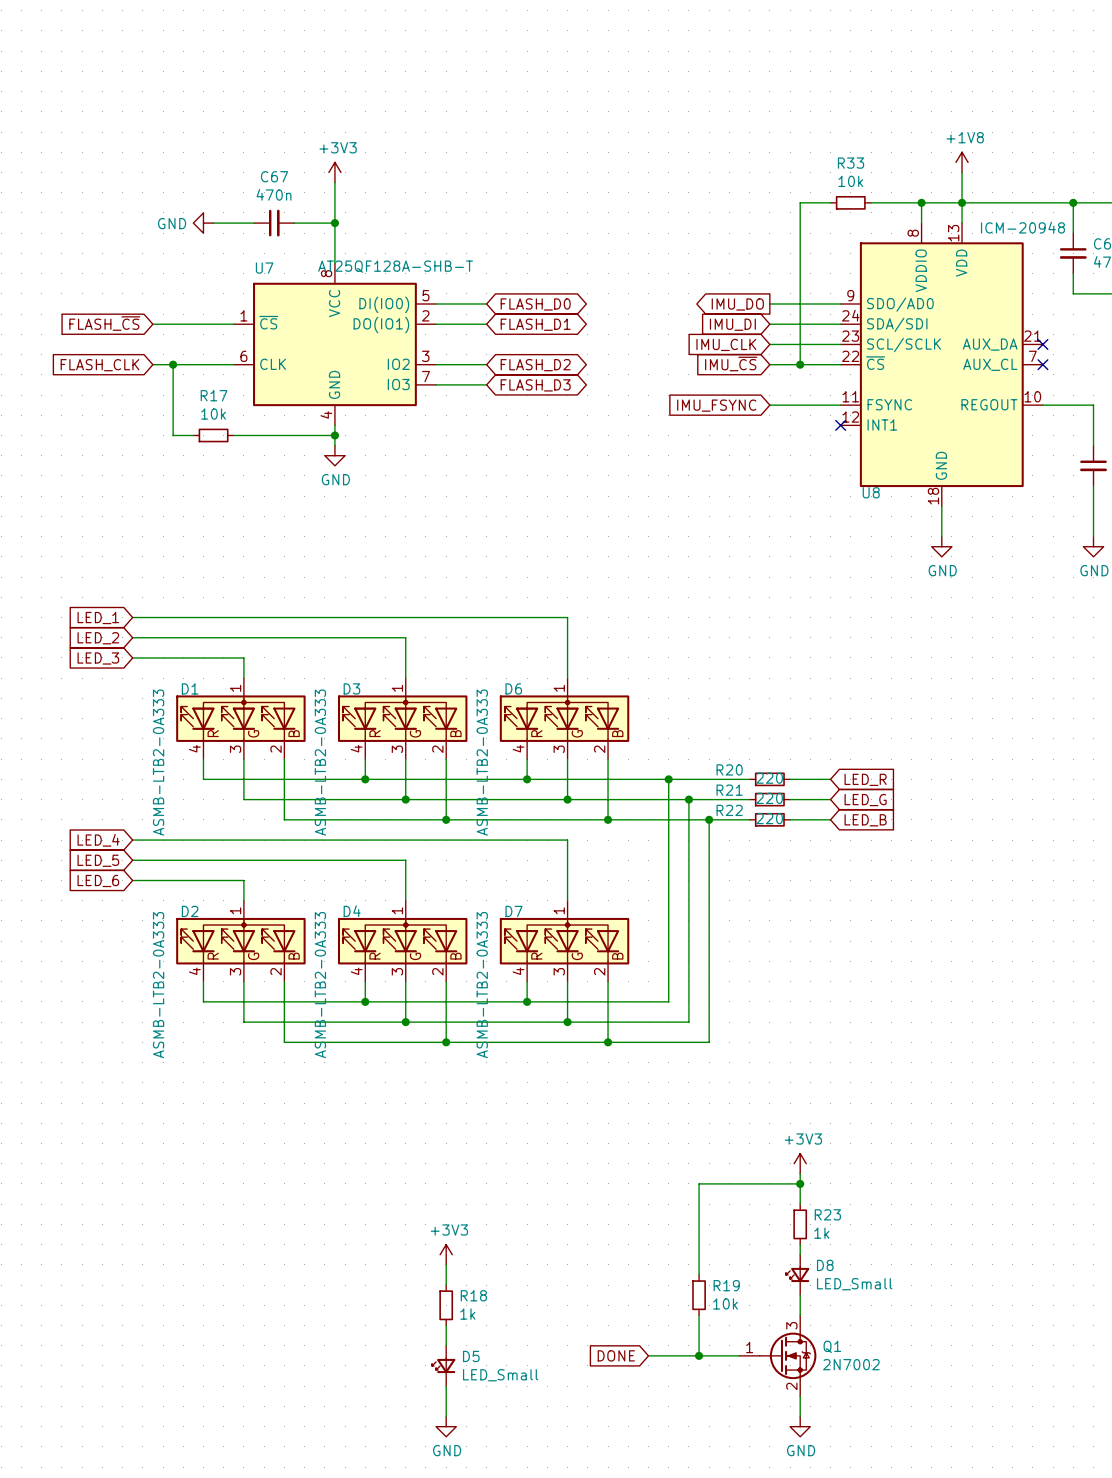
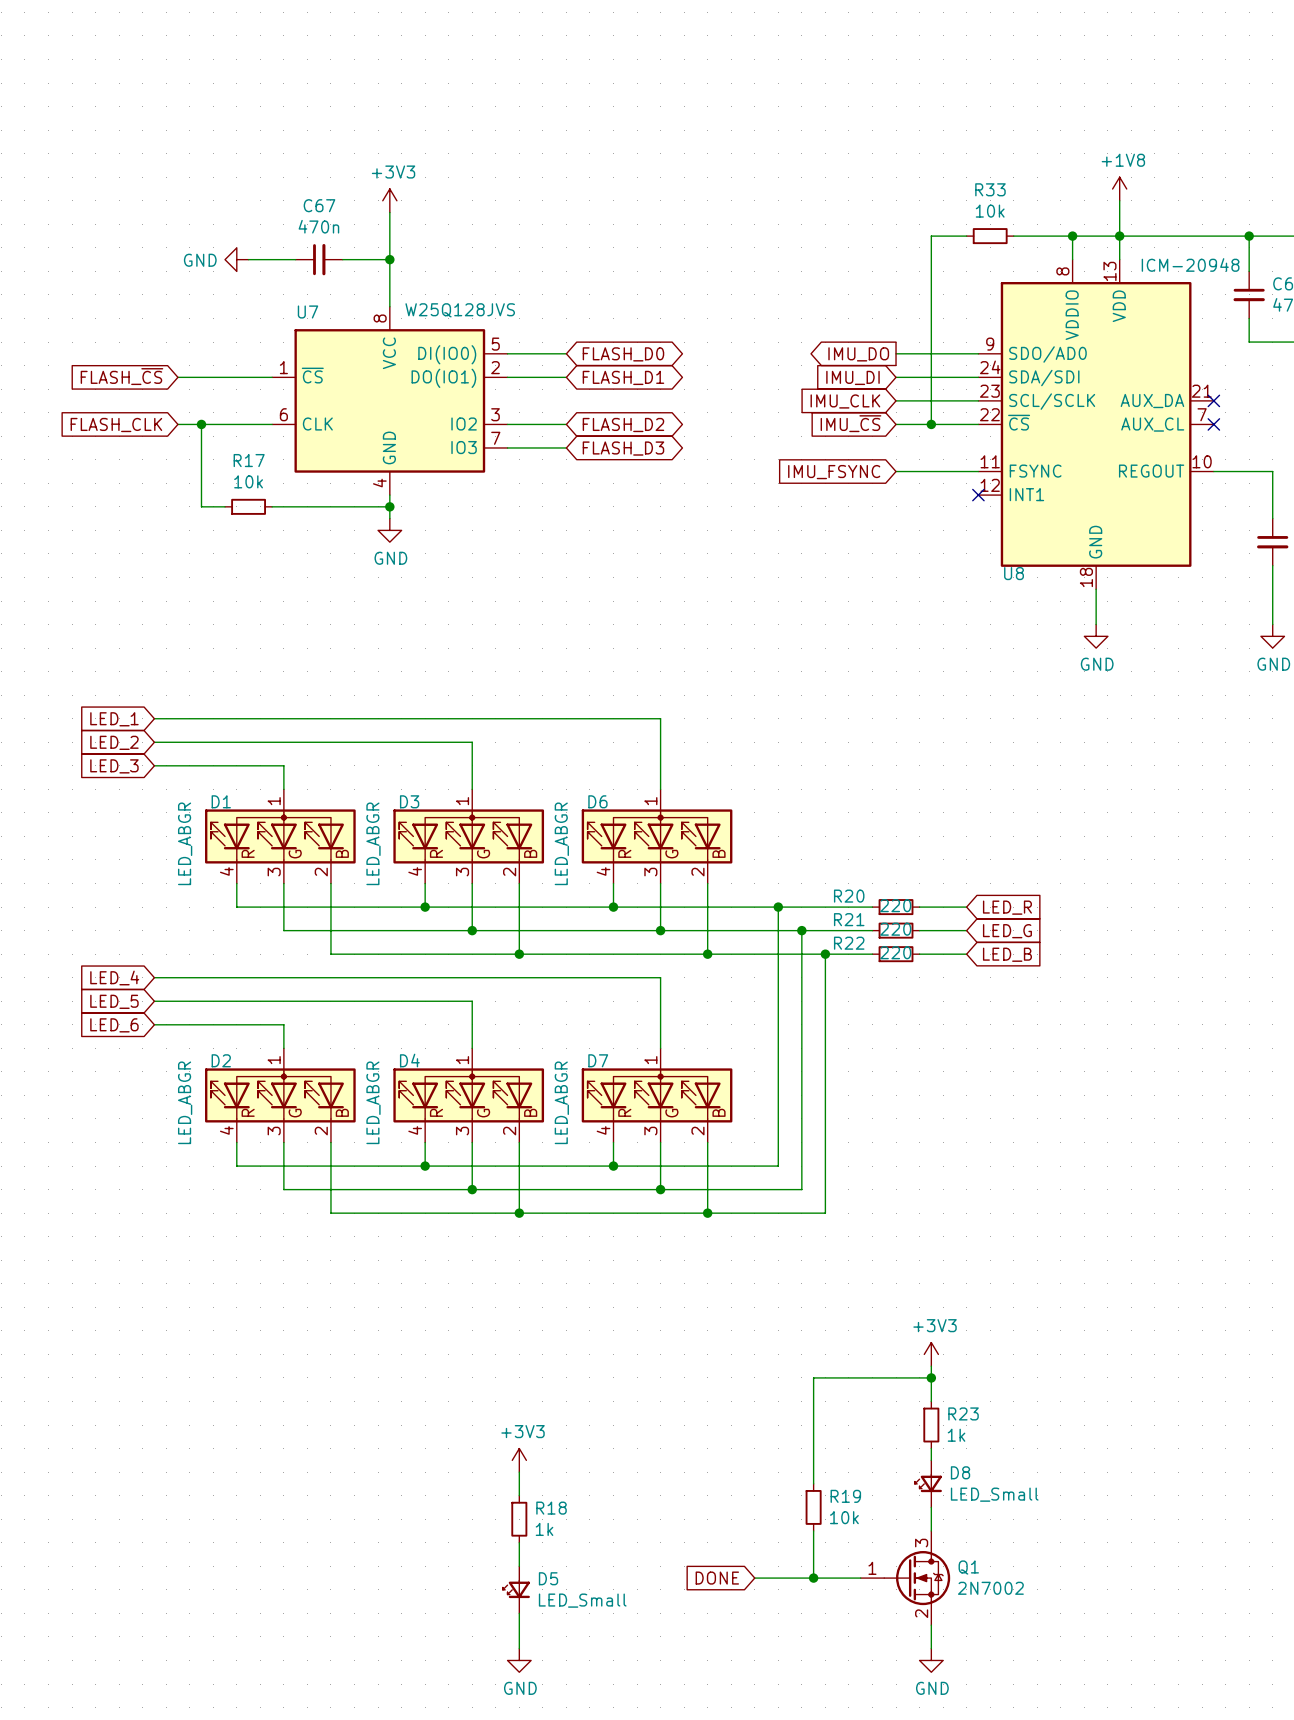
U7 value: AT25QF128A-SHB-T (395, 266) -> W25Q128JVS (460, 310)
D1 value: ASMB-LTB2-0A333 (158, 762) -> LED_ABGR (185, 843)
D3 value: ASMB-LTB2-0A333 (320, 762) -> LED_ABGR (373, 843)
D6 value: ASMB-LTB2-0A333 (482, 762) -> LED_ABGR (561, 843)
D2 value: ASMB-LTB2-0A333 (158, 985) -> LED_ABGR (185, 1102)
D4 value: ASMB-LTB2-0A333 (320, 985) -> LED_ABGR (373, 1102)
D7 value: ASMB-LTB2-0A333 (482, 985) -> LED_ABGR (561, 1102)

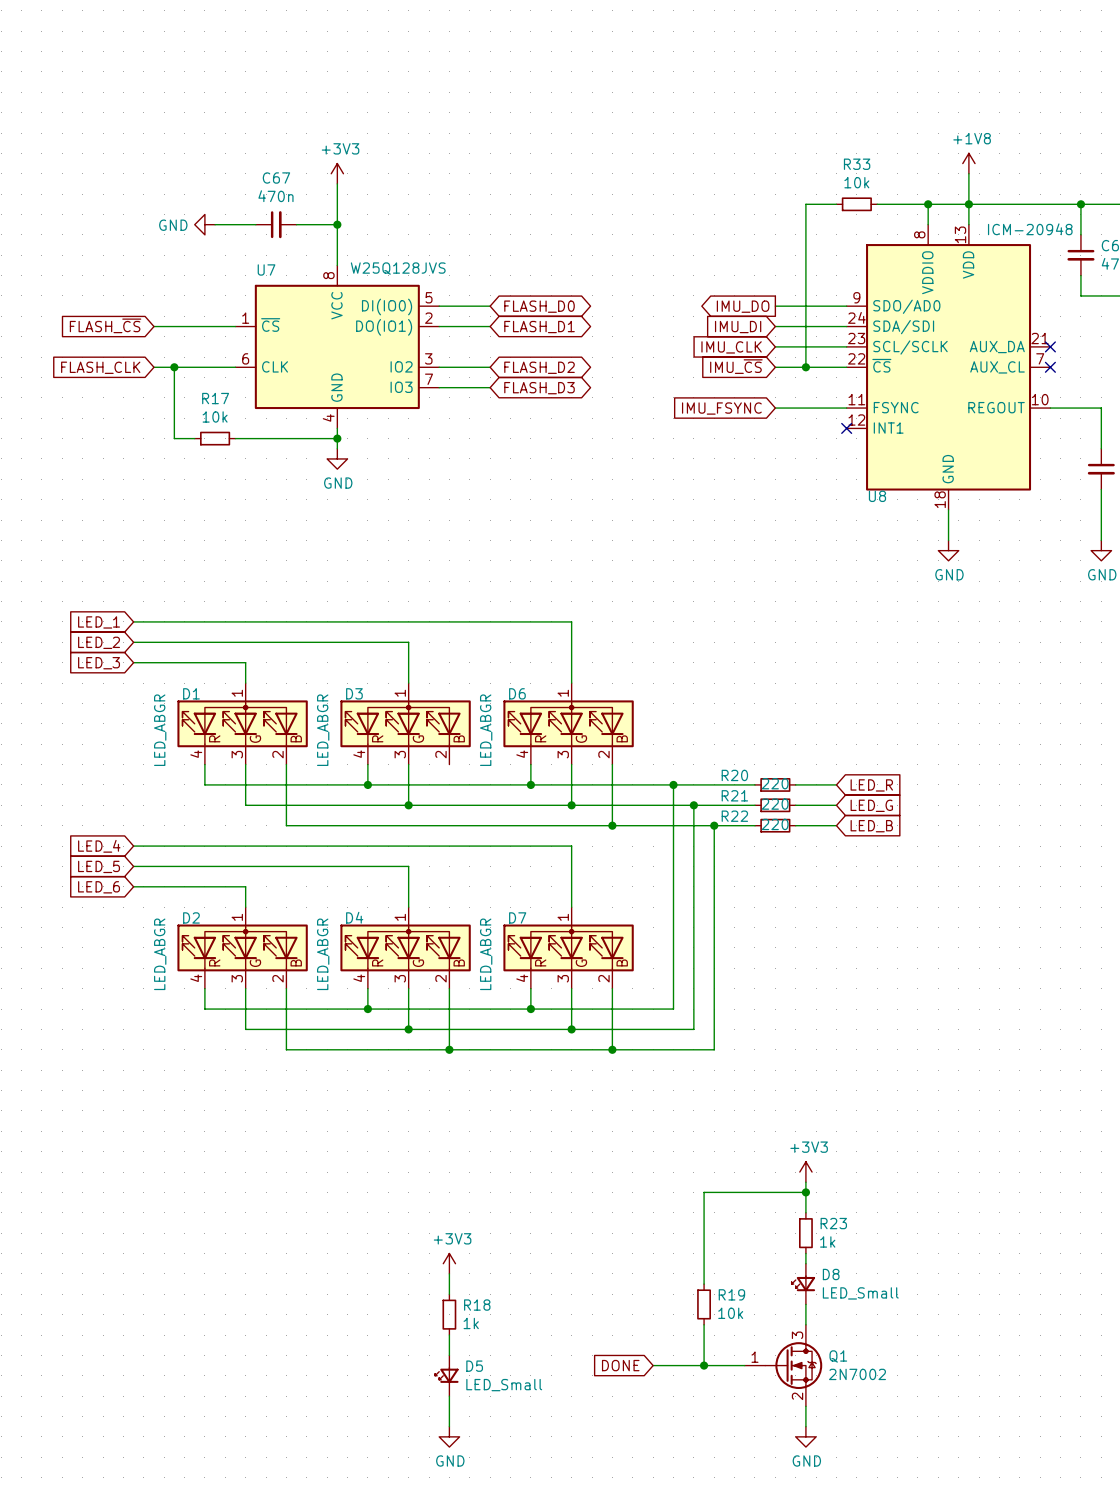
wire: (519, 883) (519, 954) -> none
junction: (519, 954) -> none

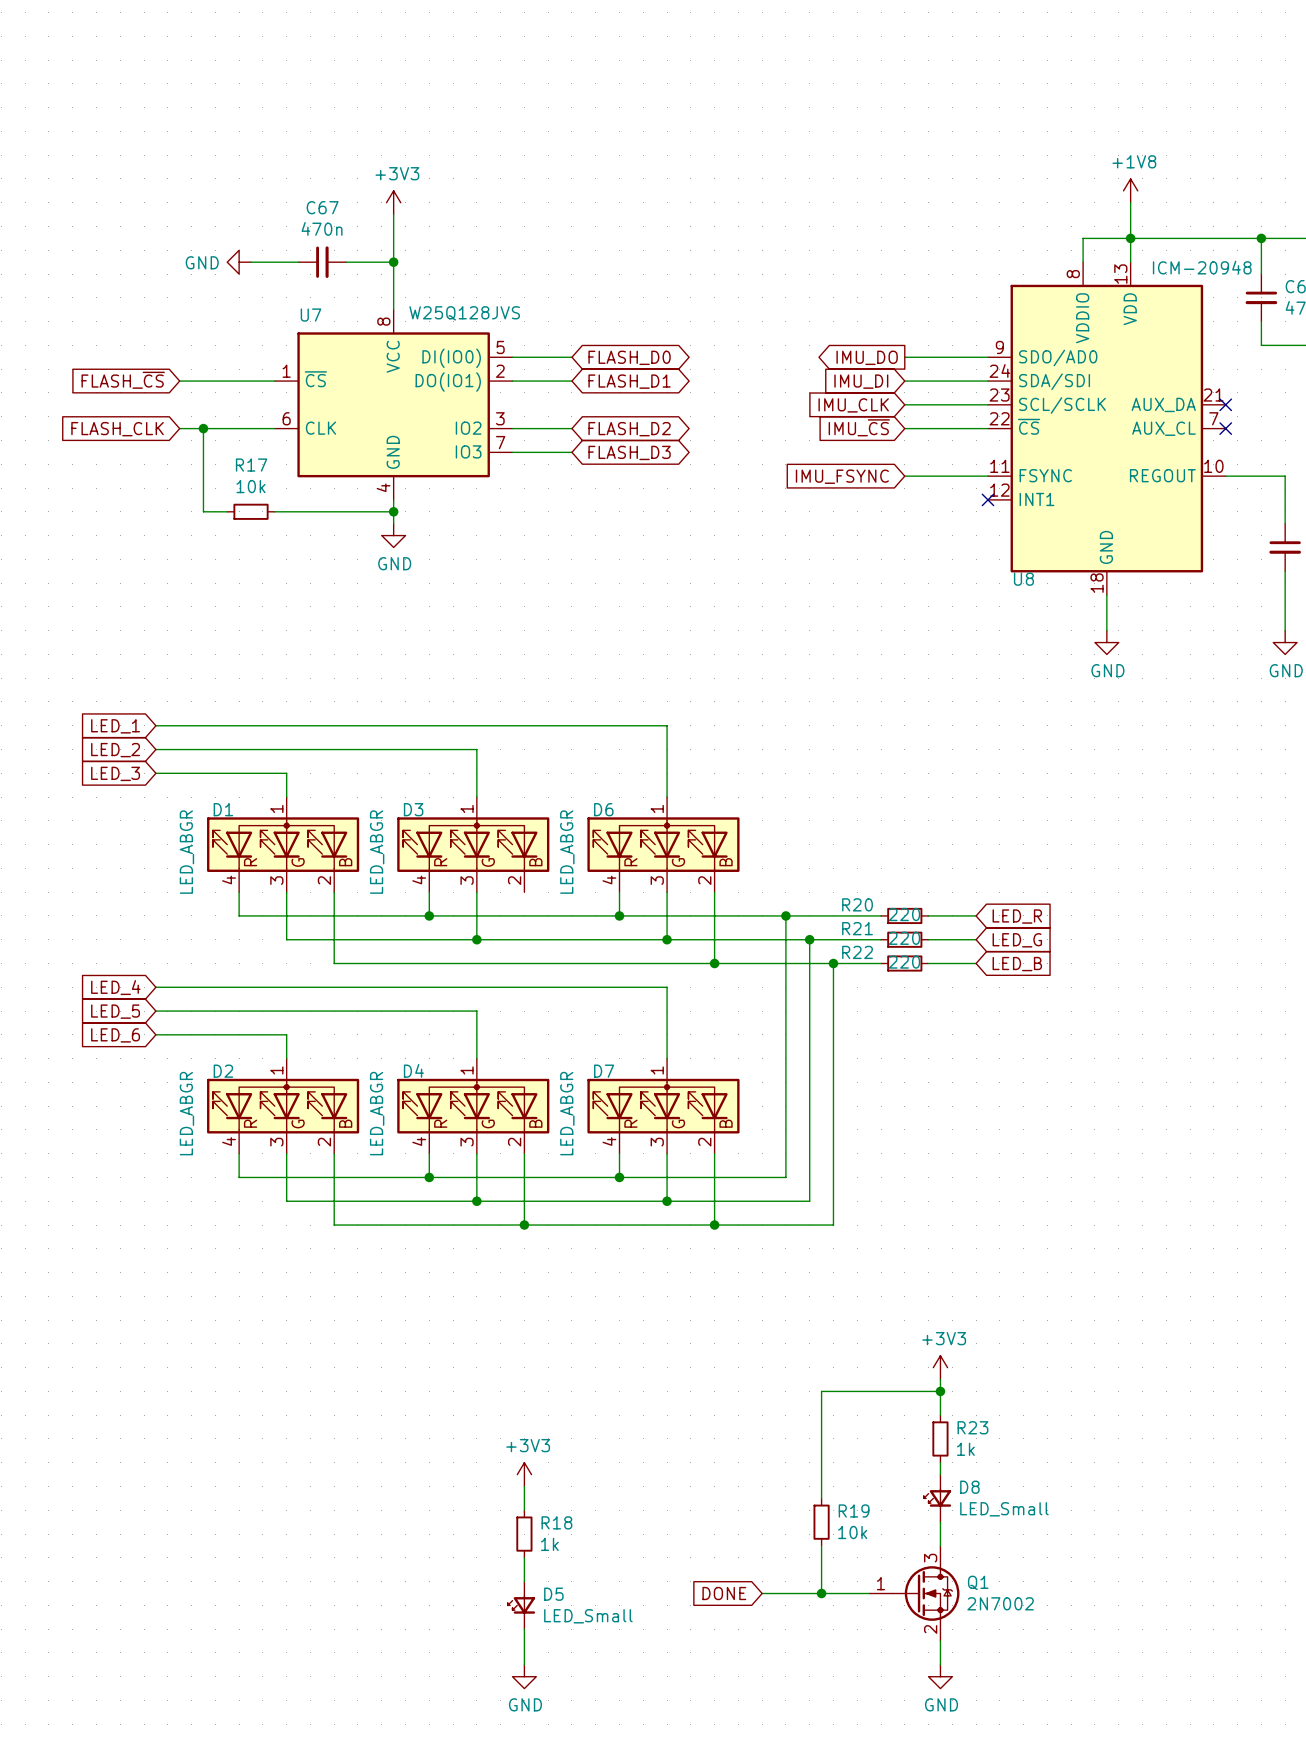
wire: (836, 204) (805, 204) (805, 367) -> none
R33: 10k (856, 204) -> none
wire: (877, 204) (928, 204) -> none
junction: (928, 204) -> none
junction: (805, 367) -> none

